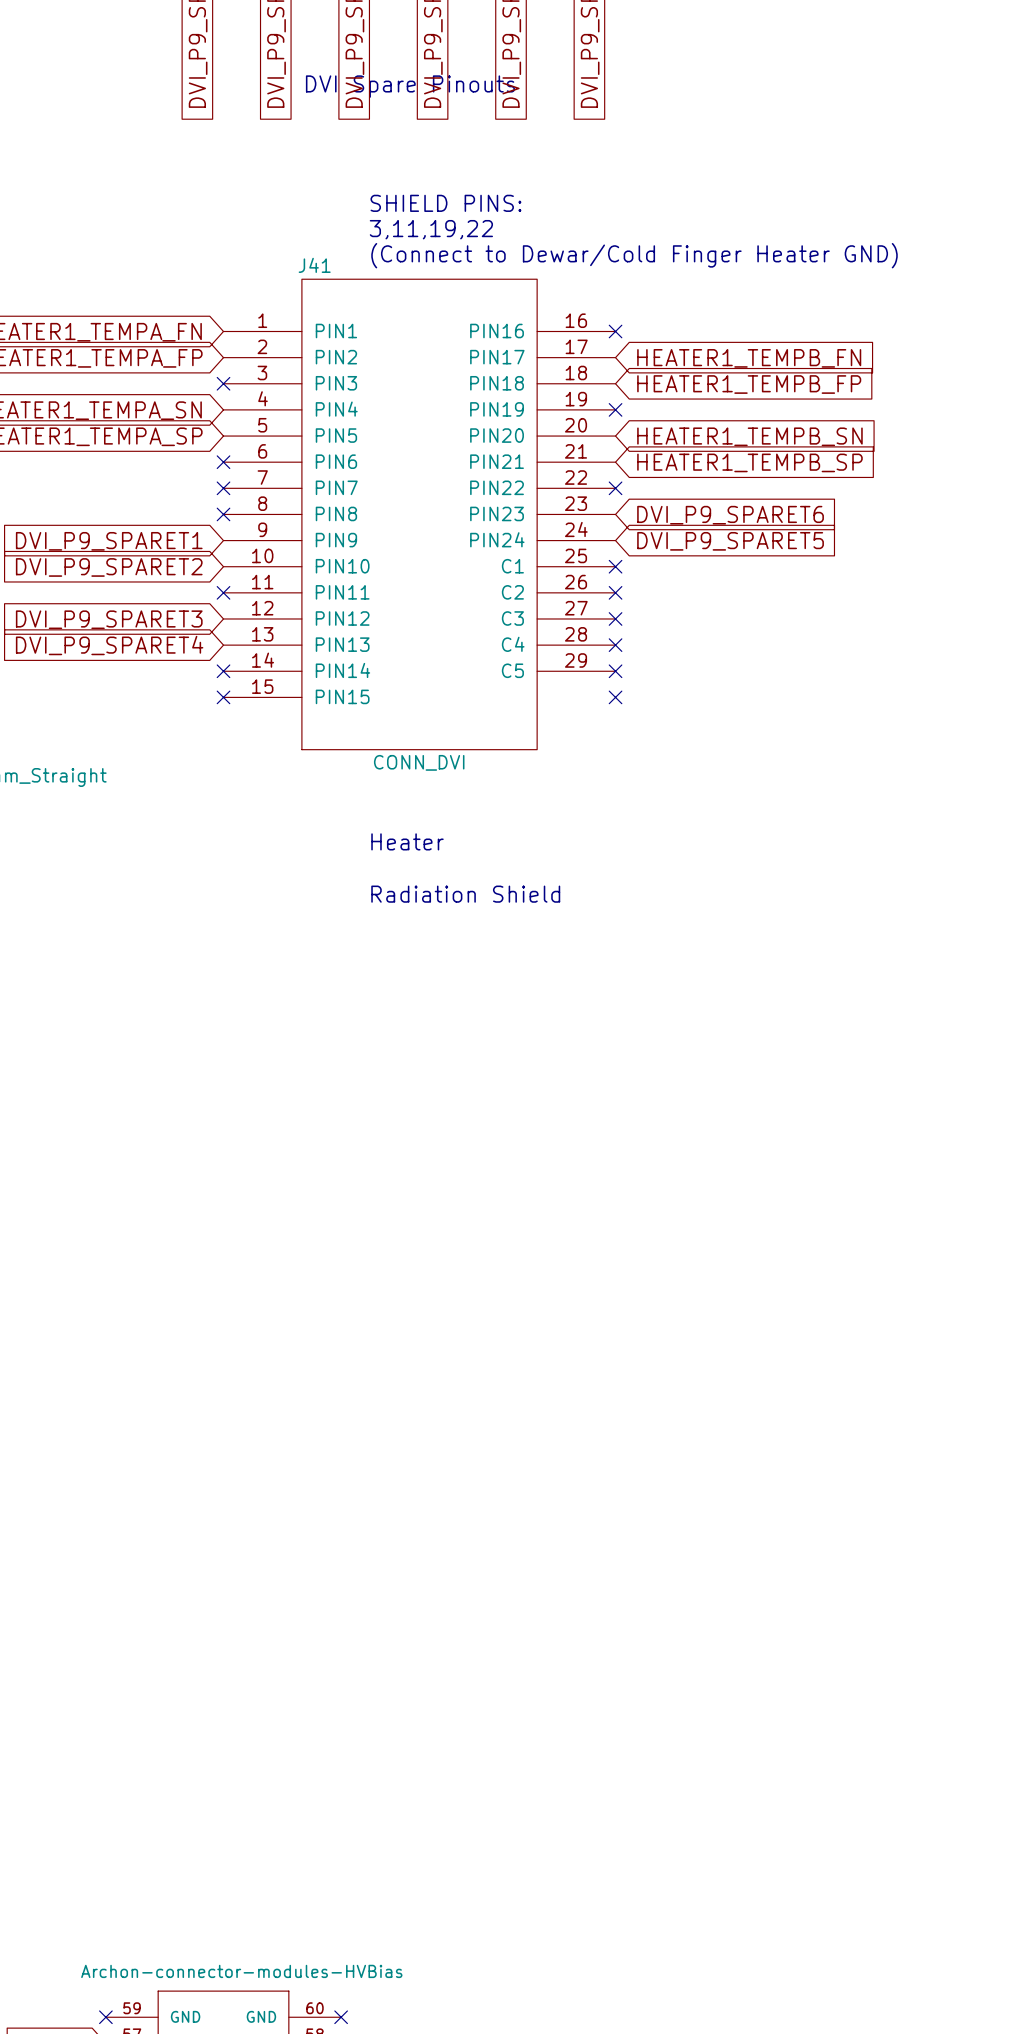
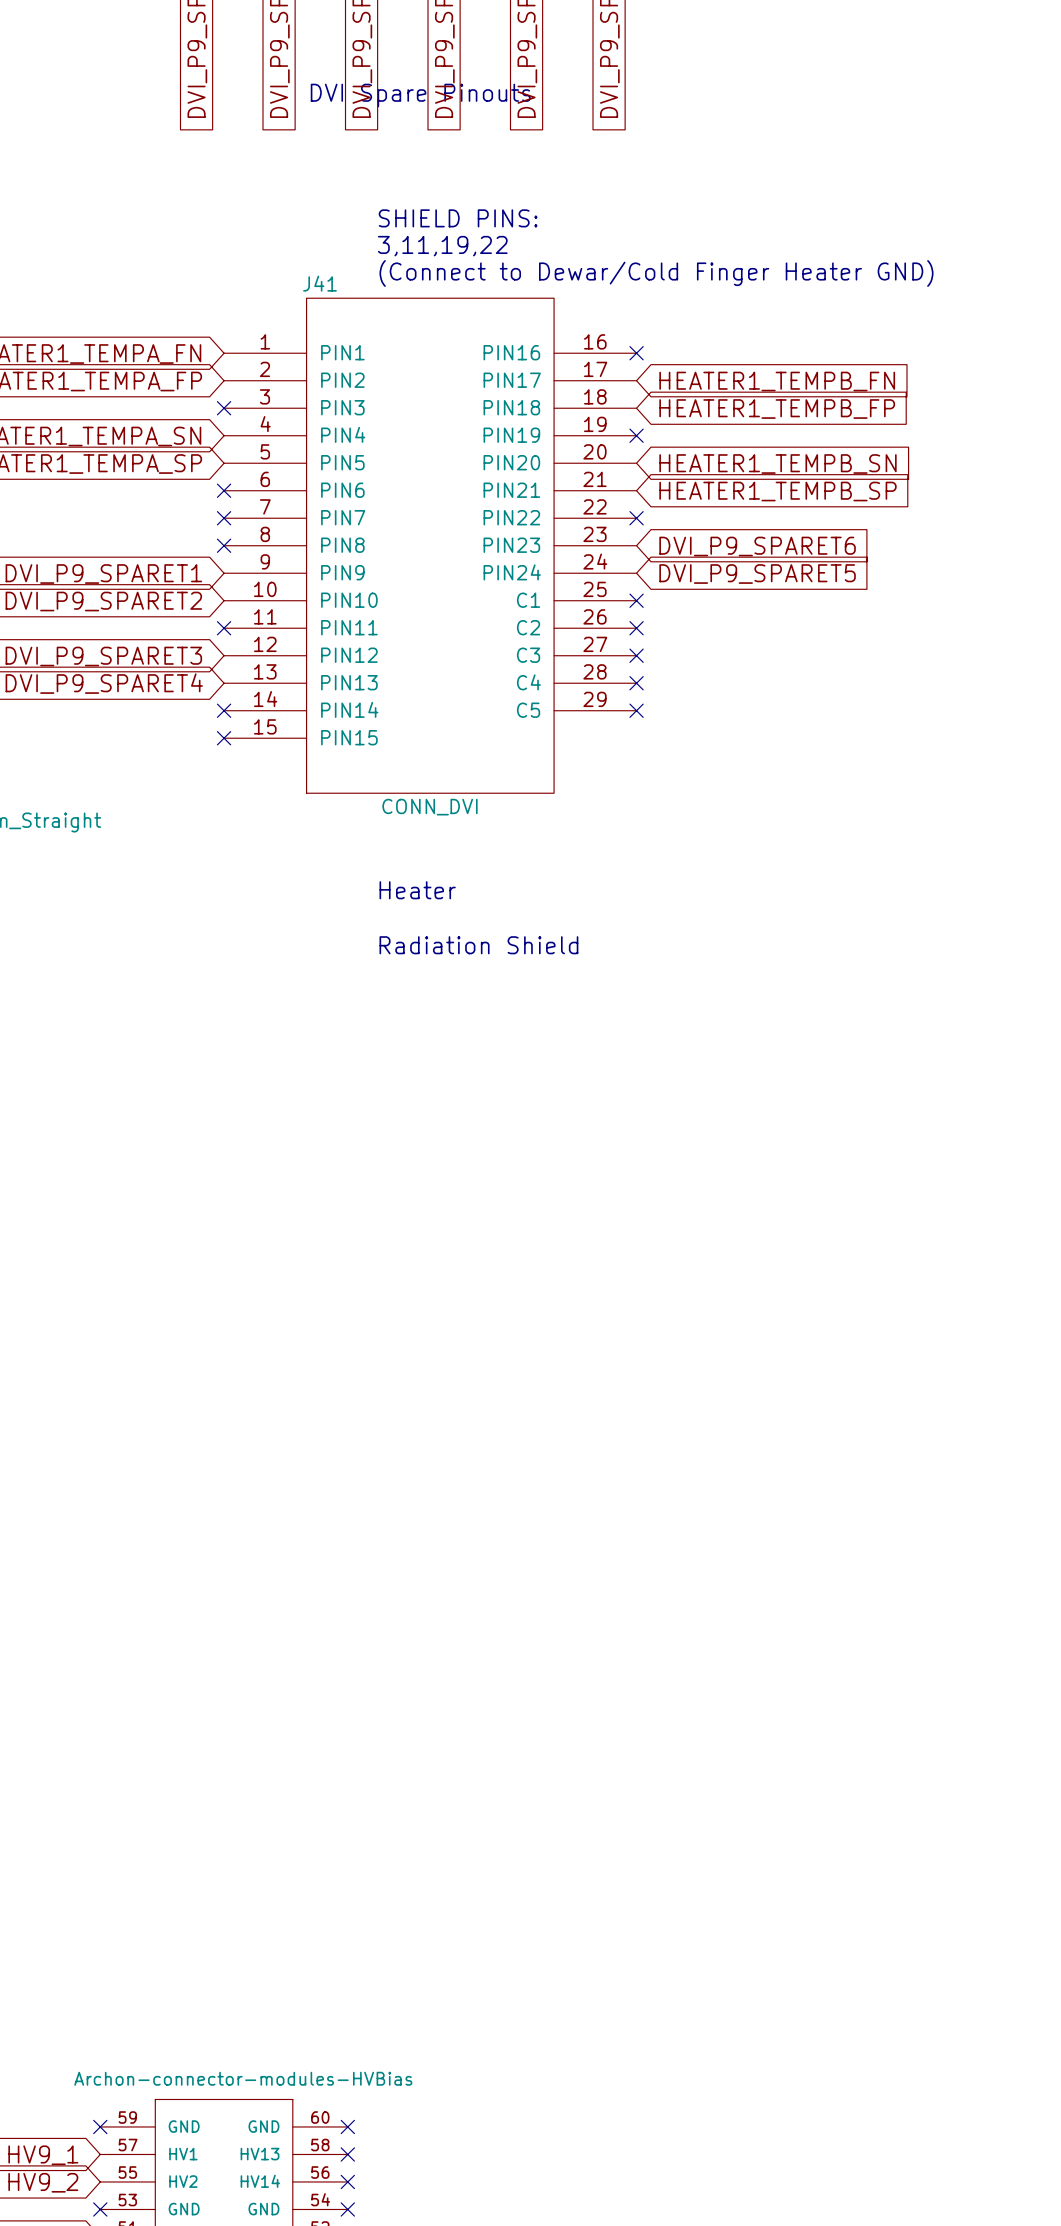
no-connect mark: (615, 697) -> none

